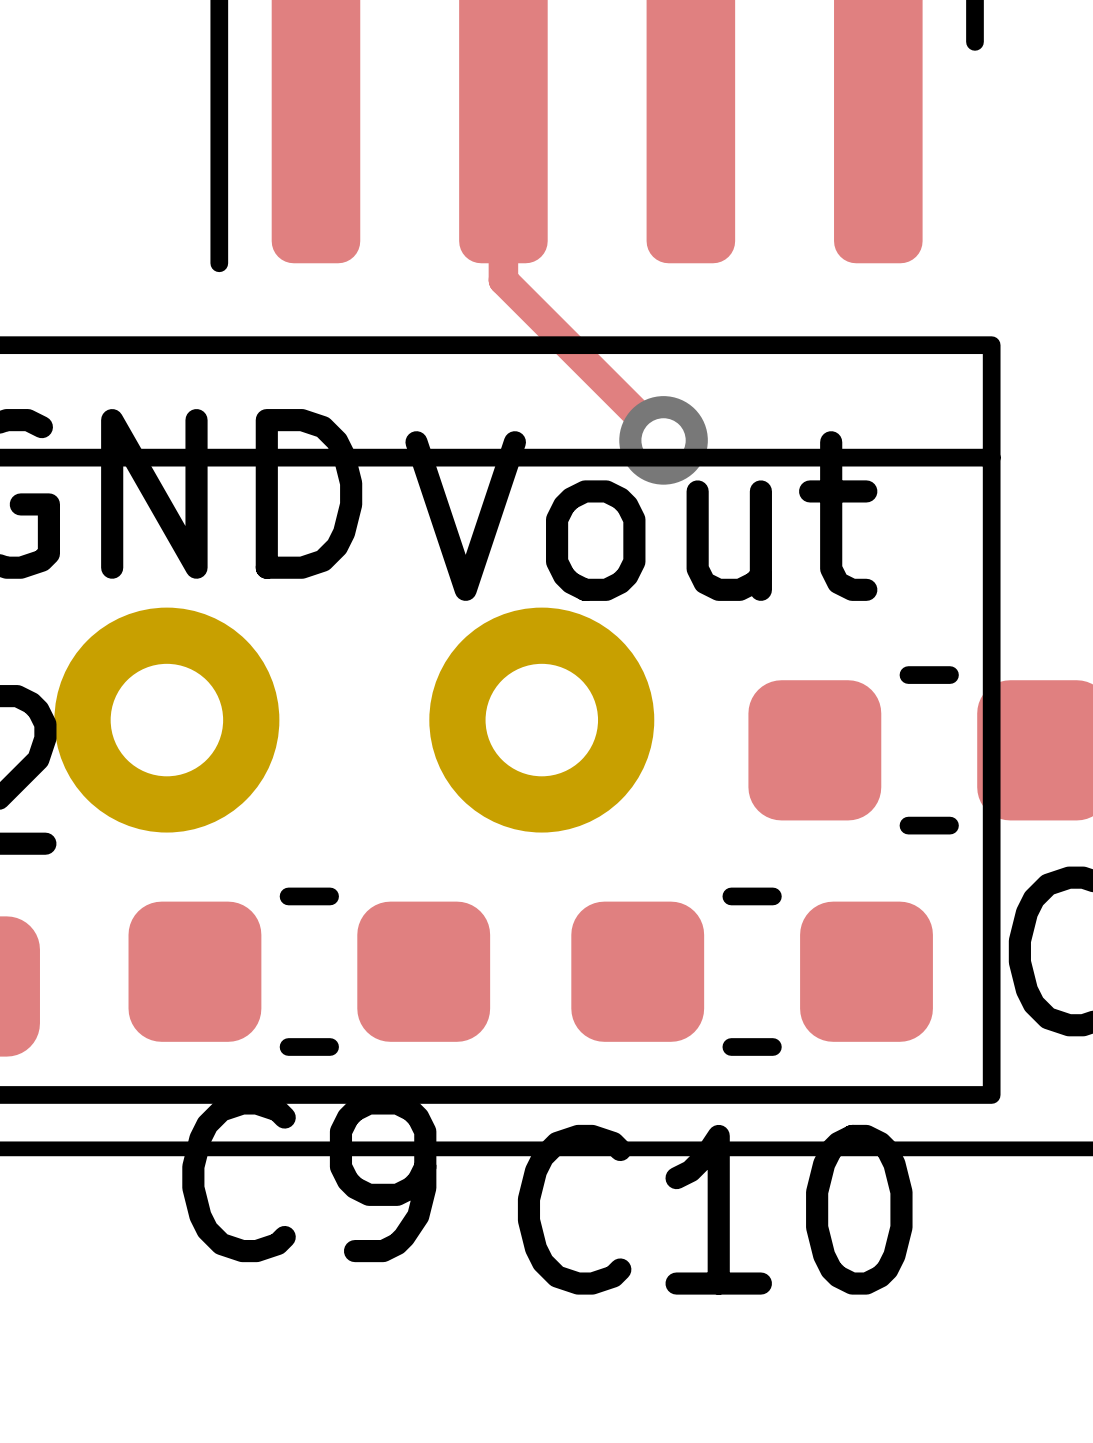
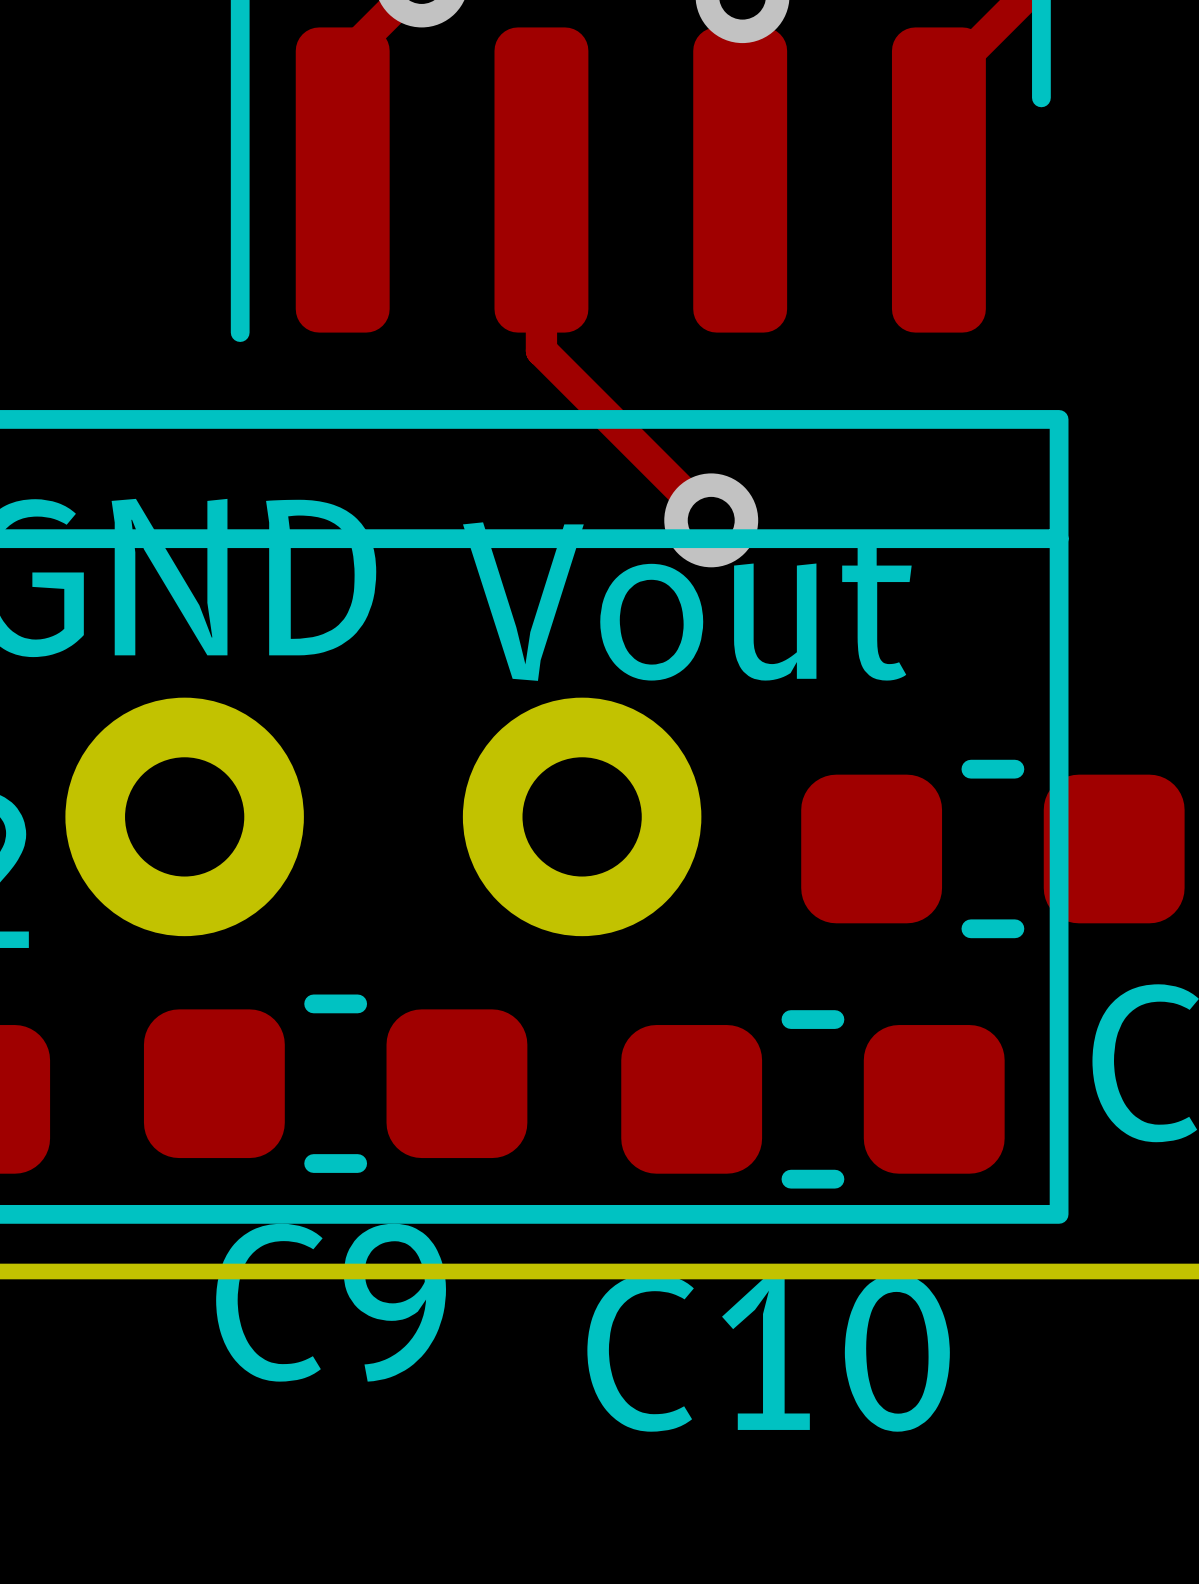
C10 position: (752, 971) -> (812, 1099)

